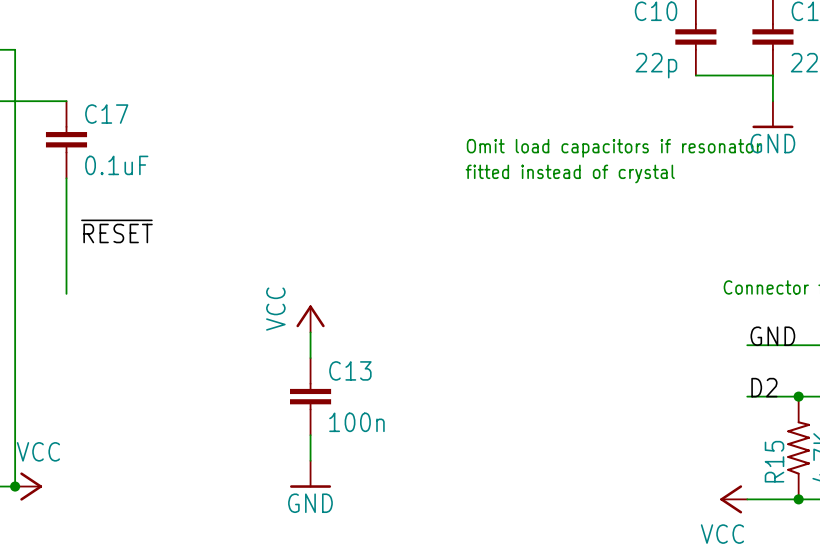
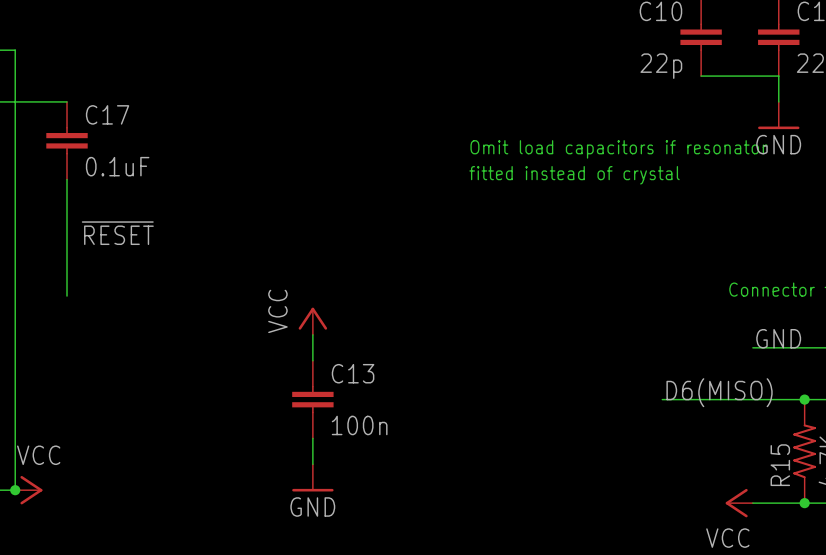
label: D2 (764, 387) -> none
label: none -> D6(MISO) (719, 392)
wire: none -> (662, 399) (752, 399)

